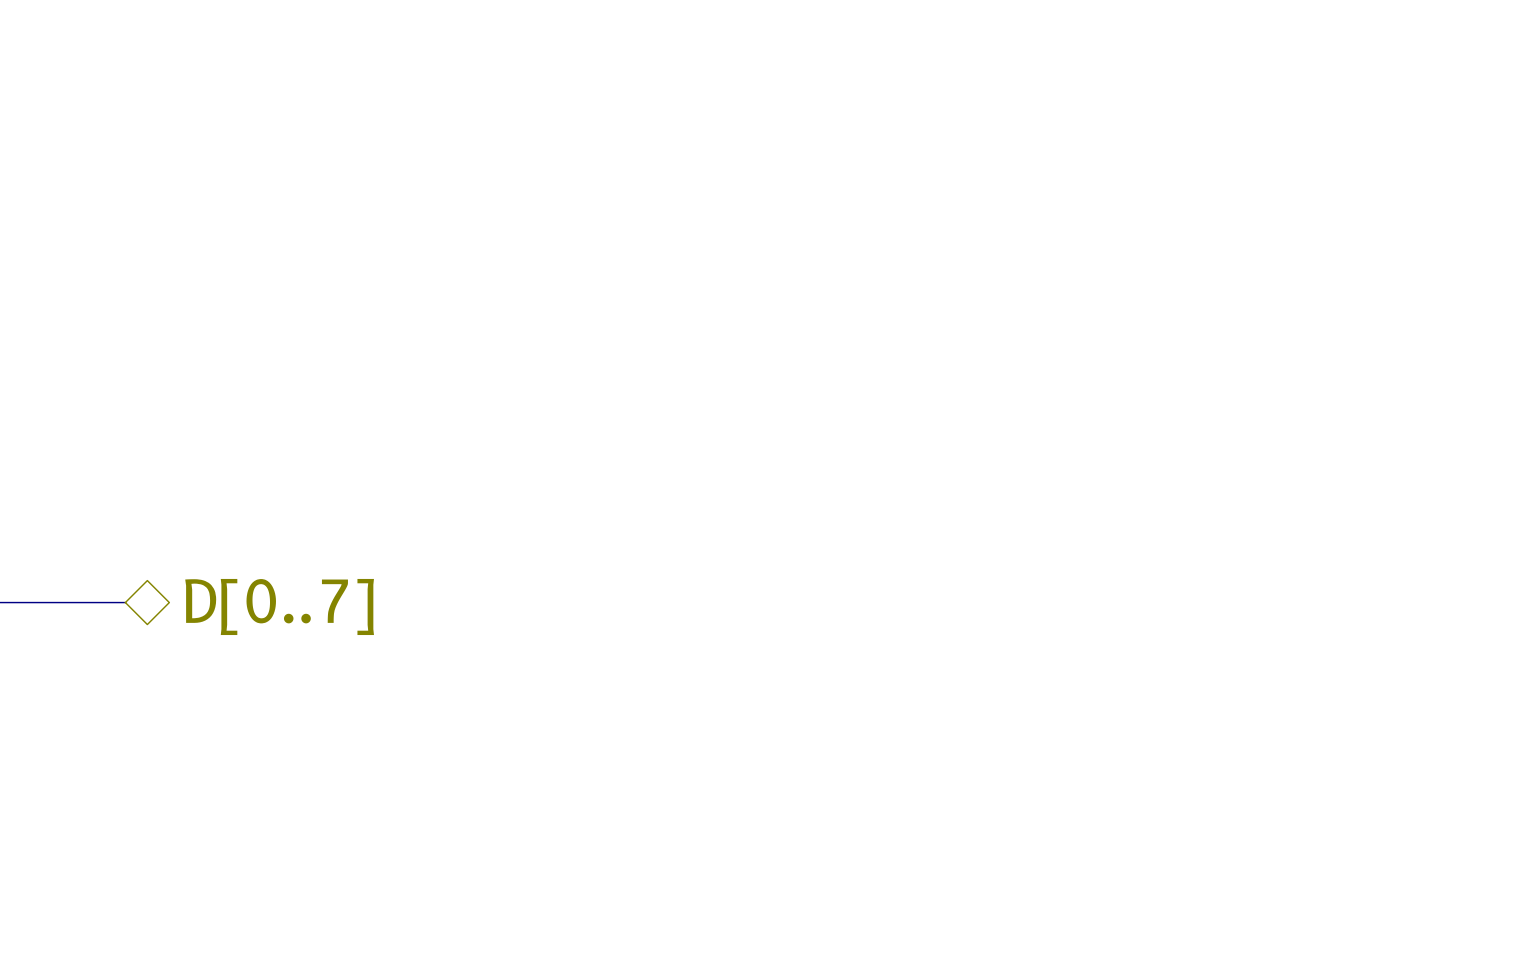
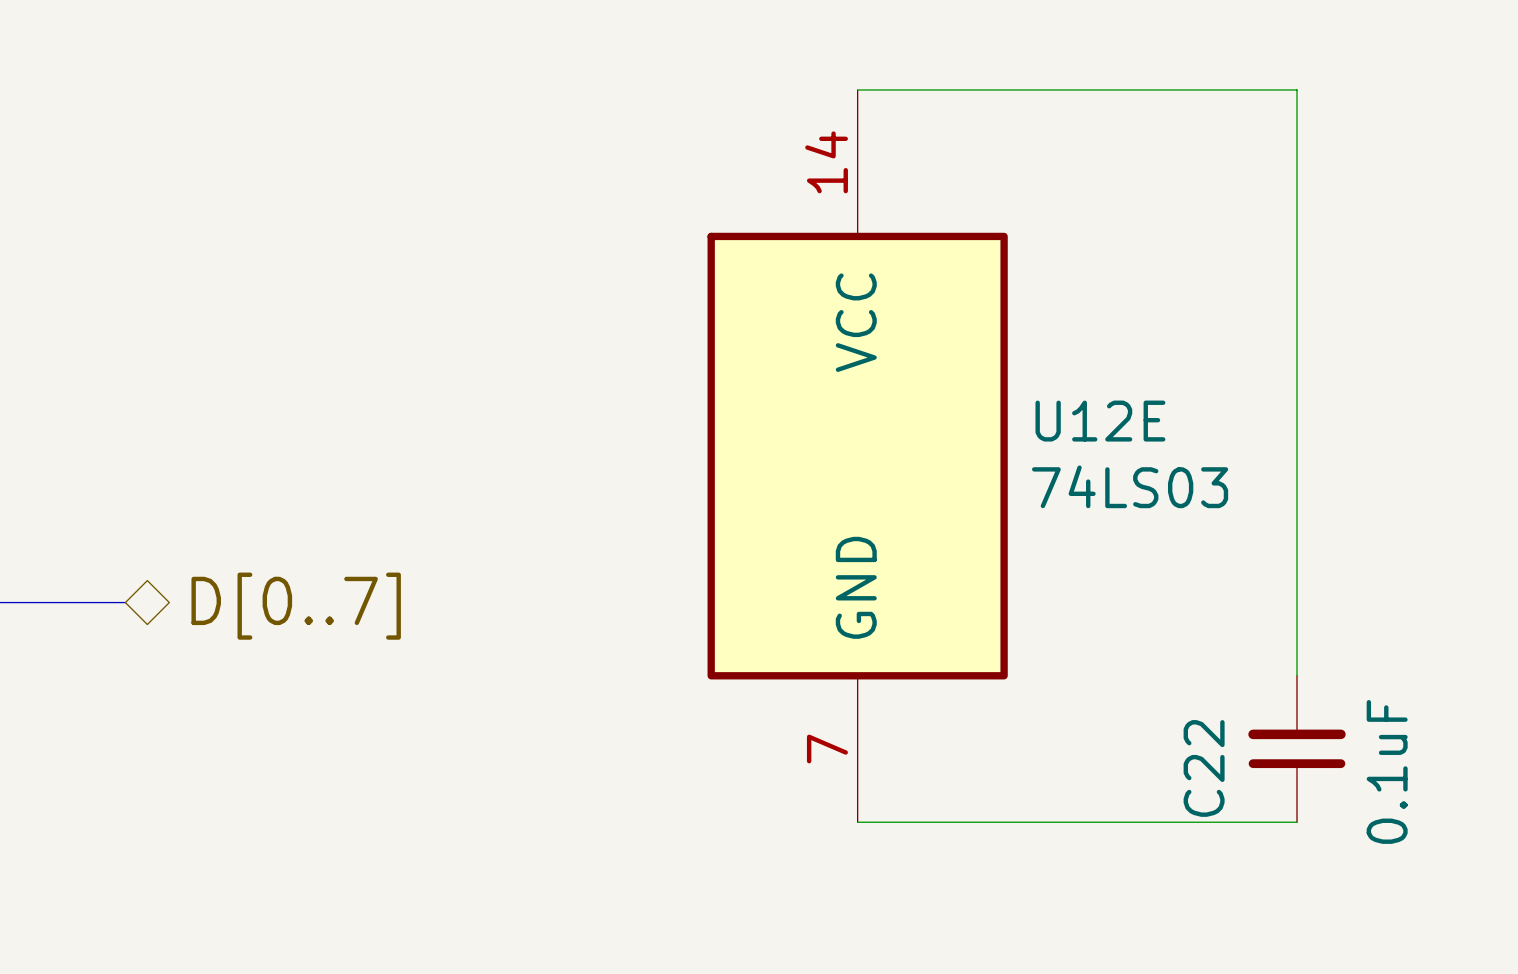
wire: none -> (857, 89) (1297, 89) (1297, 675)
U12E: none -> 74LS03 (857, 456)
C22: none -> 0.1uF (1297, 749)
wire: none -> (857, 822) (1297, 822)

